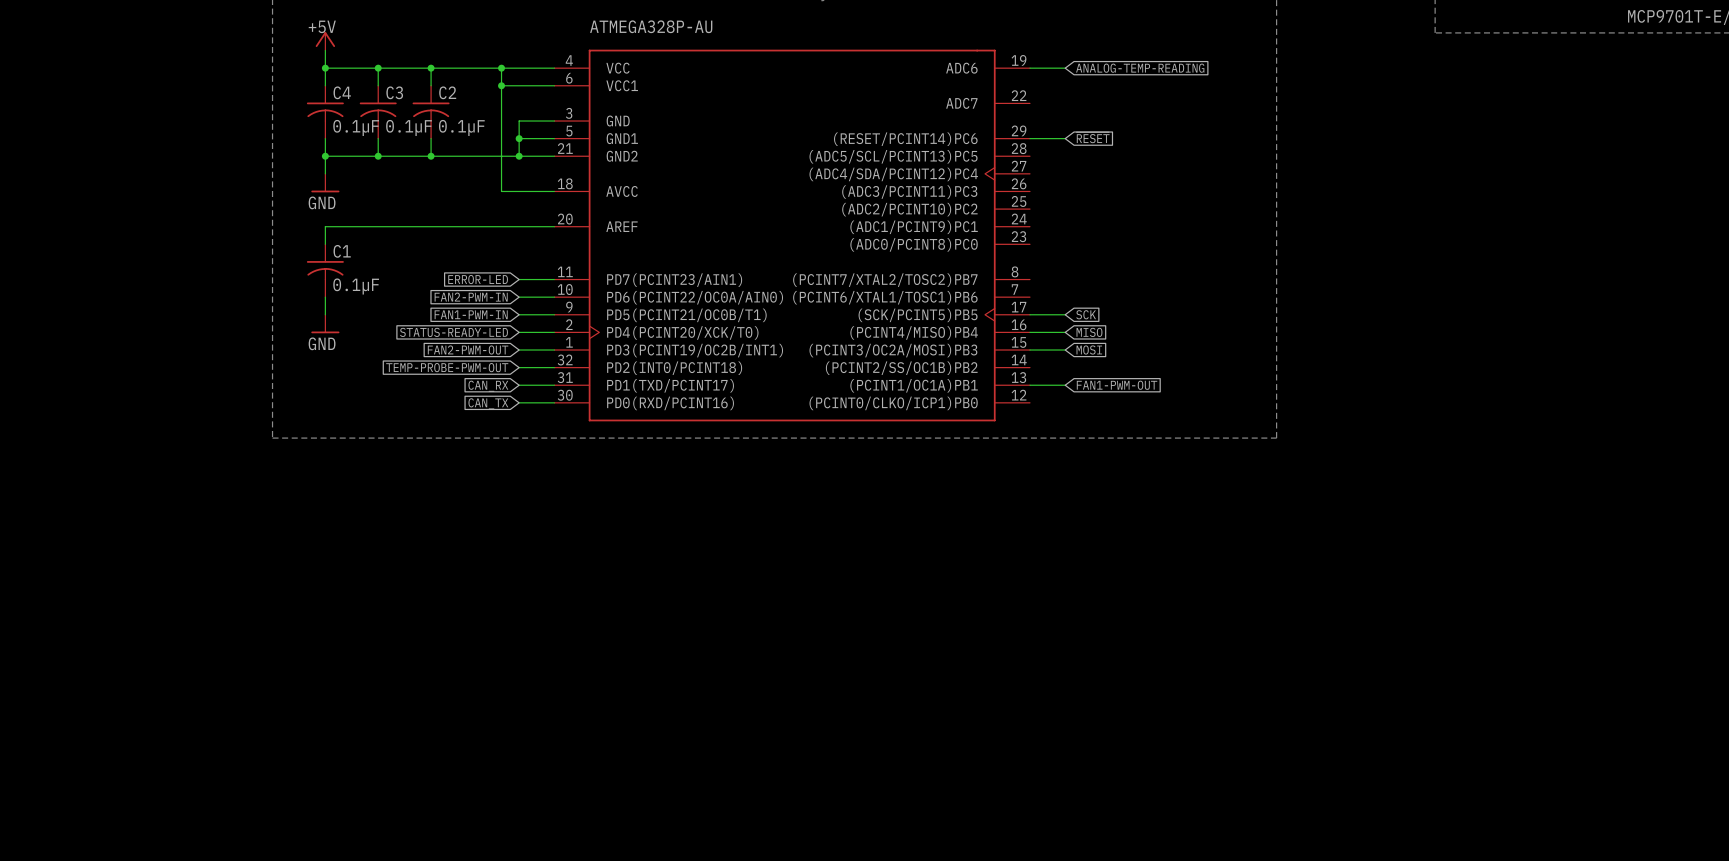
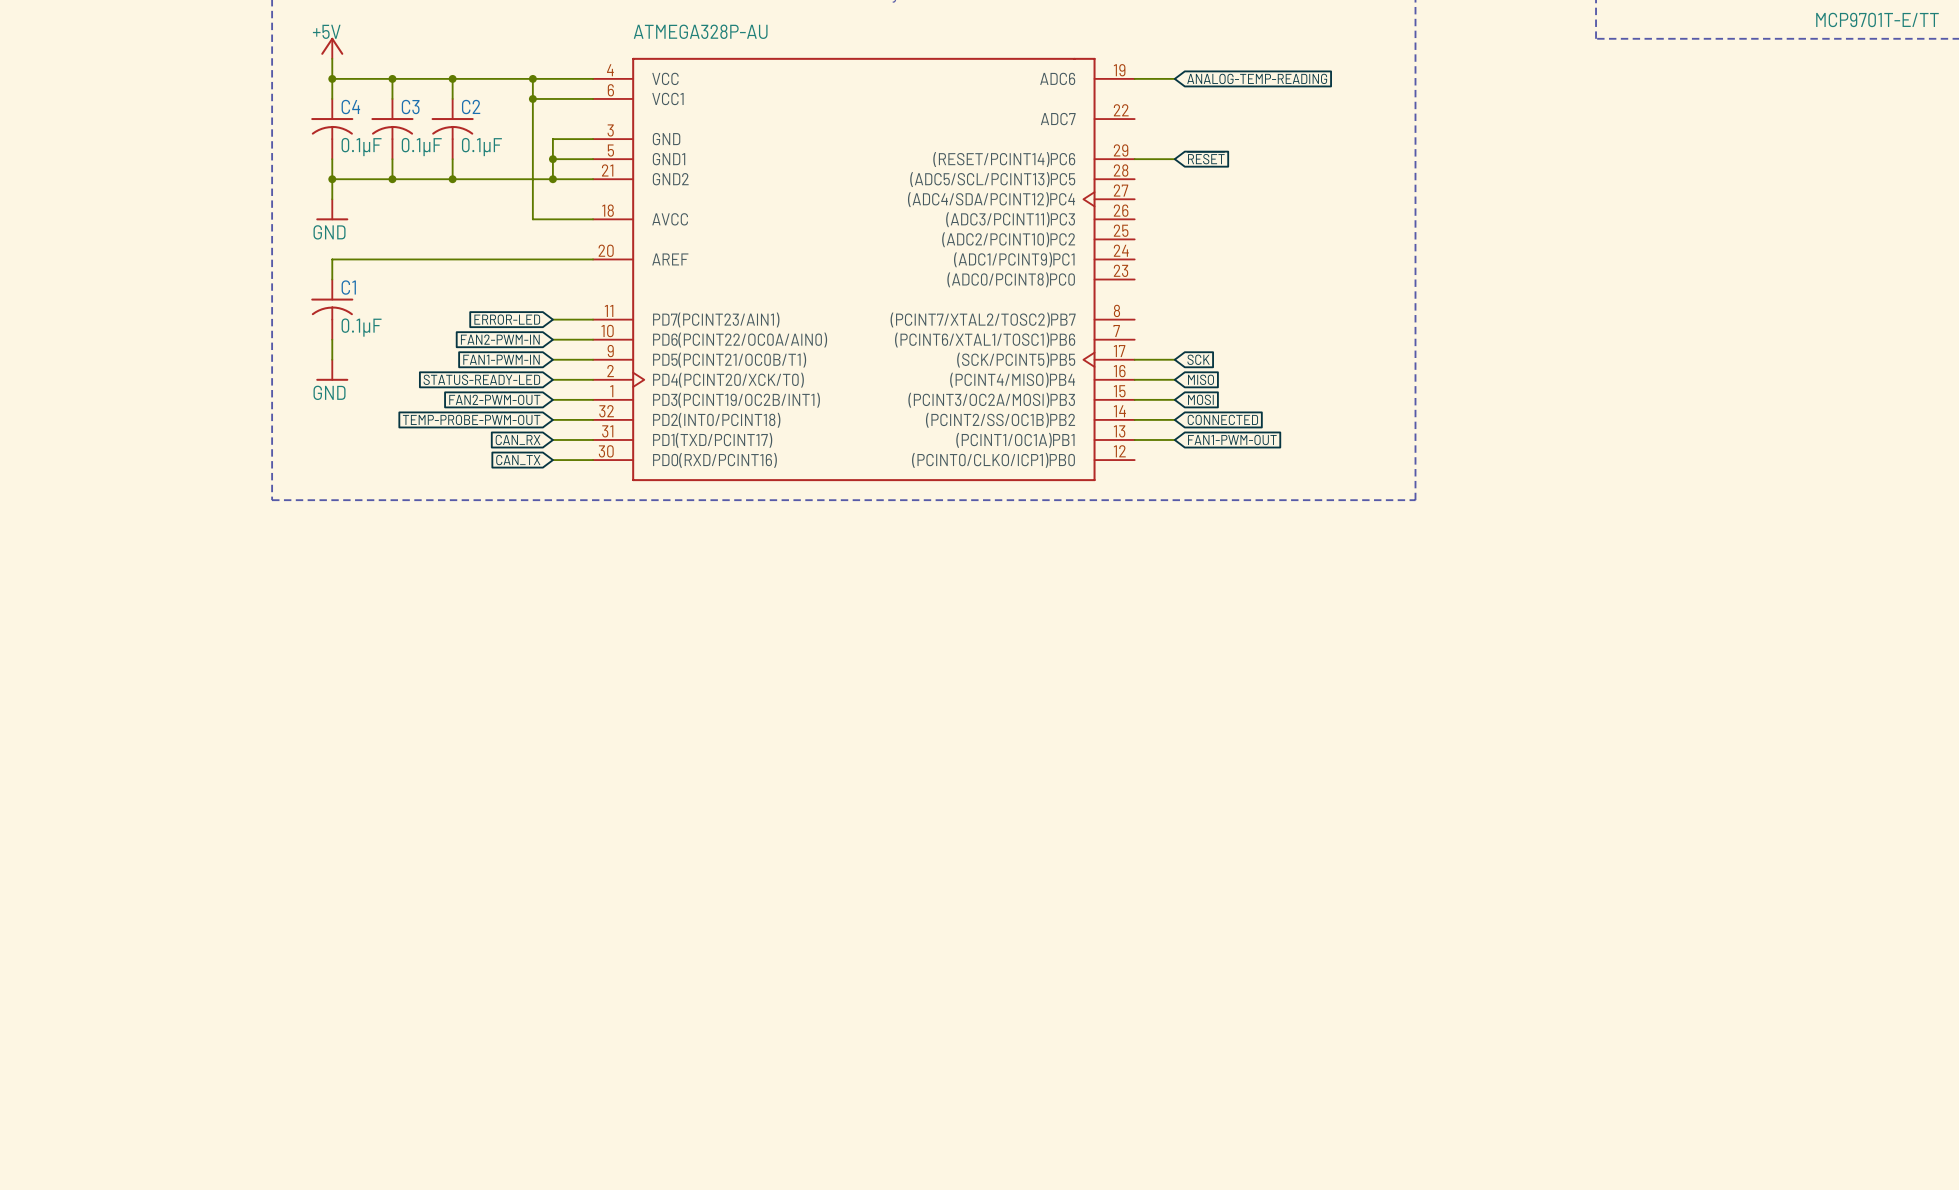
wire: none -> (1134, 419) (1174, 419)
global label: none -> CONNECTED (1222, 419)

